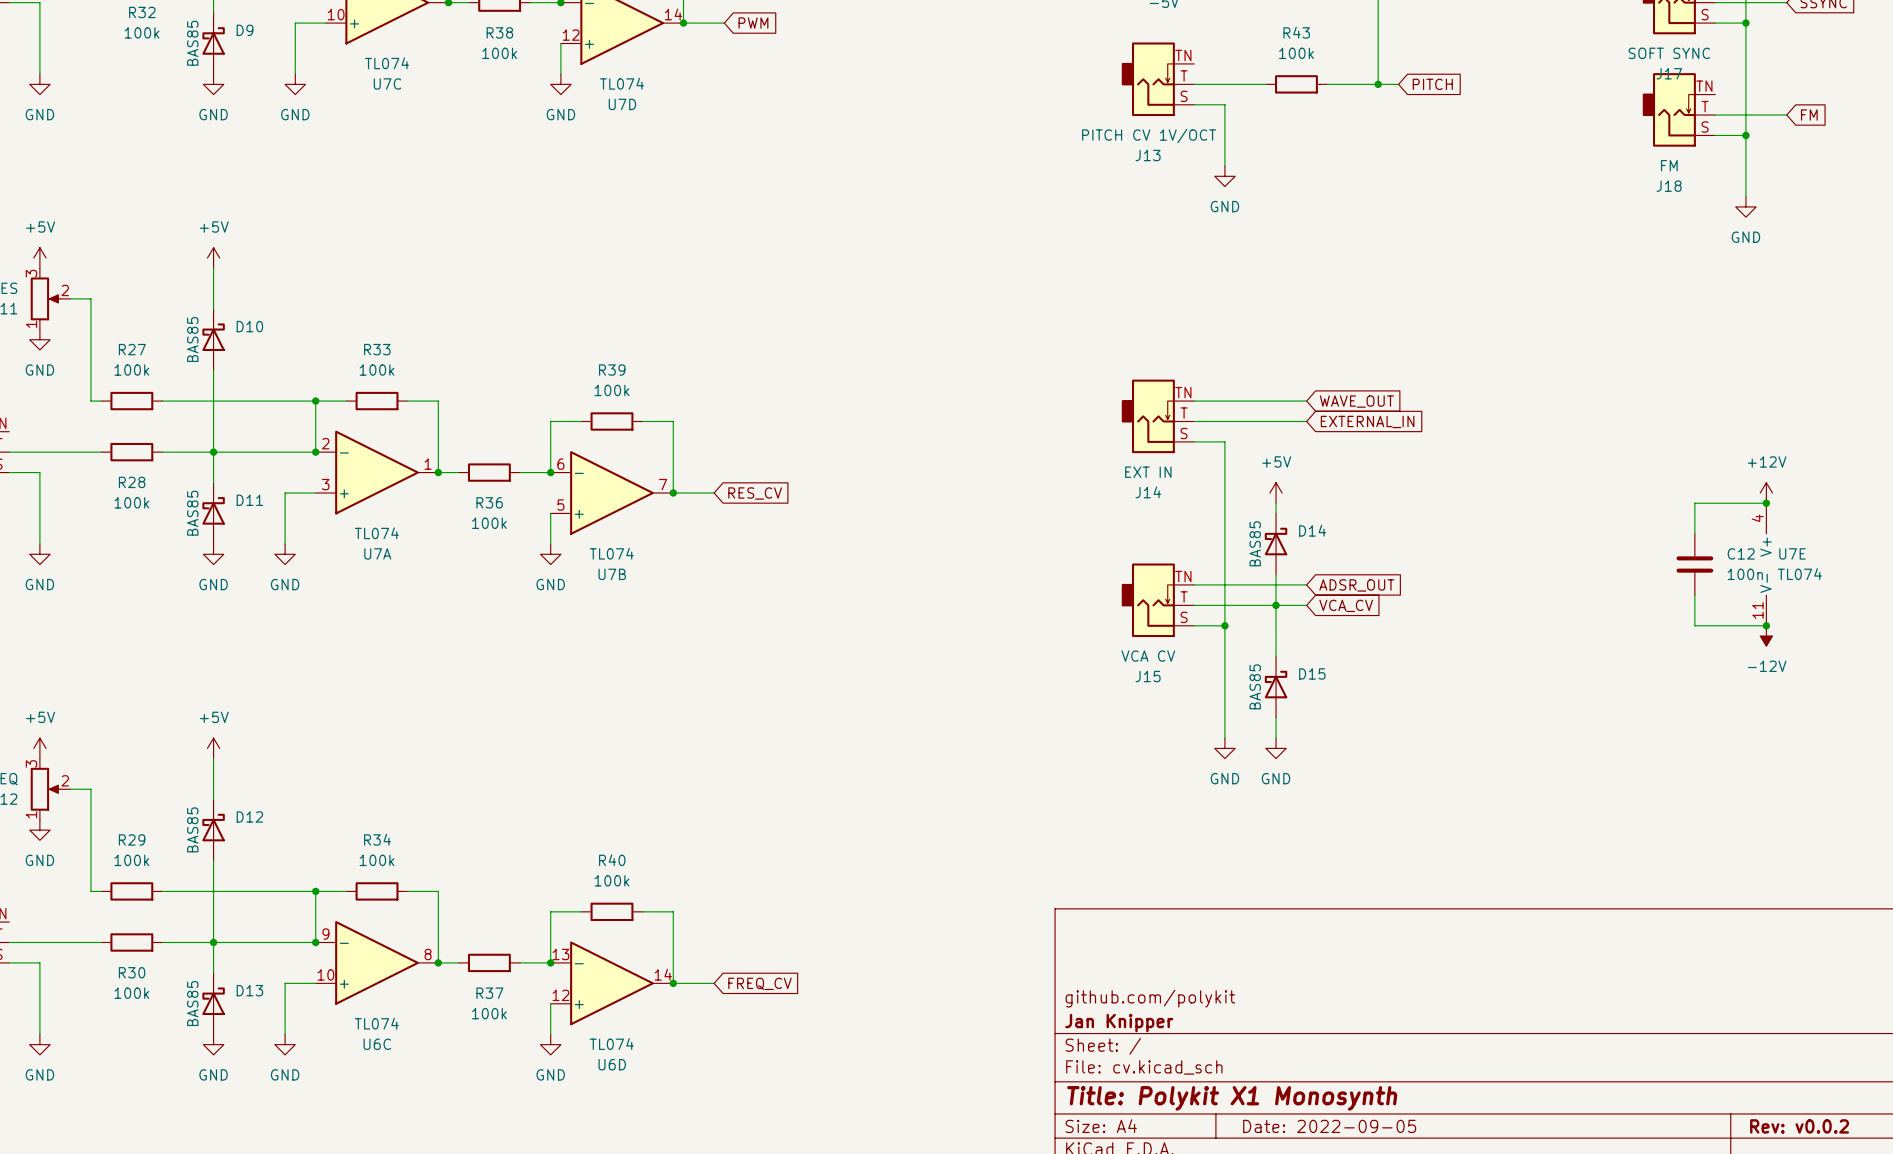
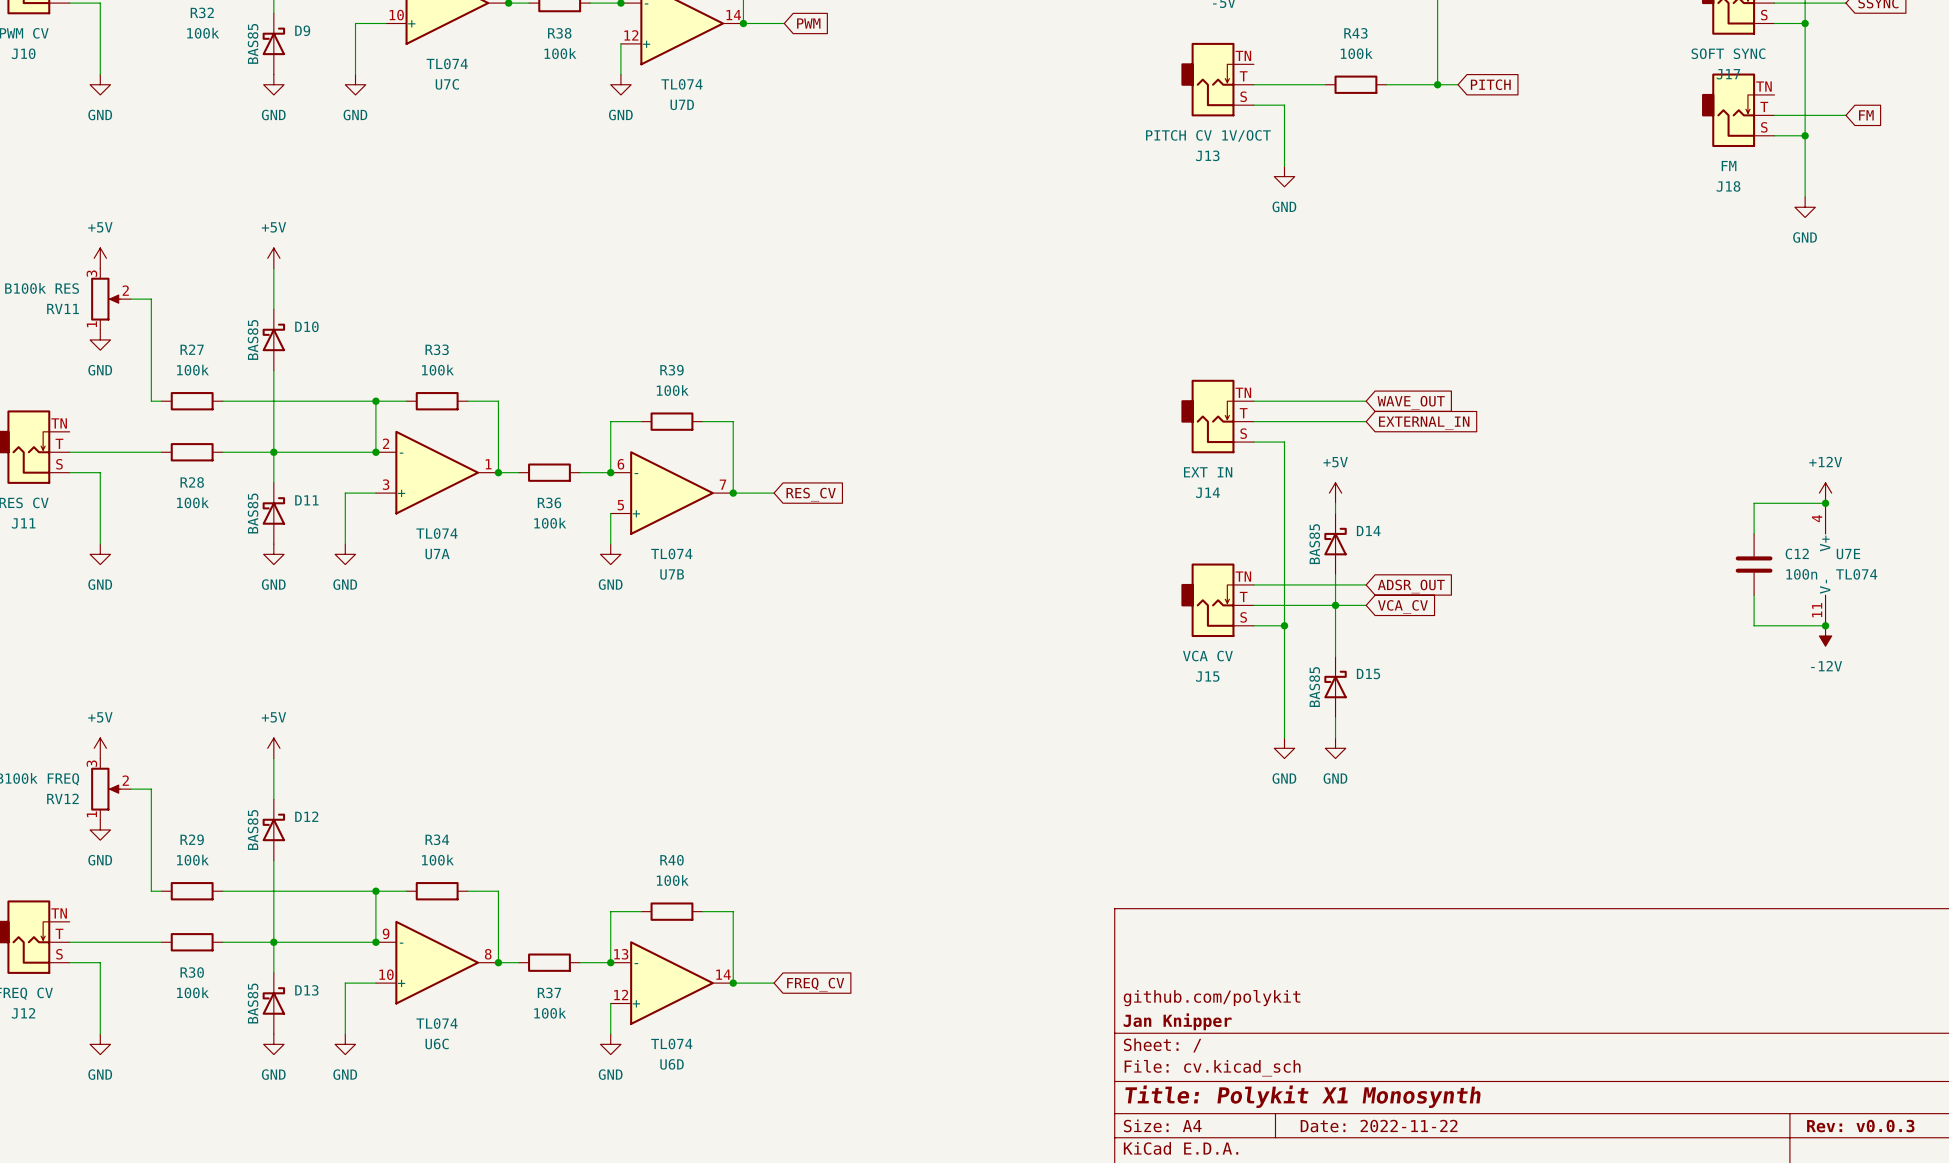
title block: Date: 2022-09-05 (1329, 1126) -> Date: 2022-11-22 (1379, 1126)
title block: Rev: v0.0.2 (1799, 1126) -> Rev: v0.0.3 (1860, 1126)

